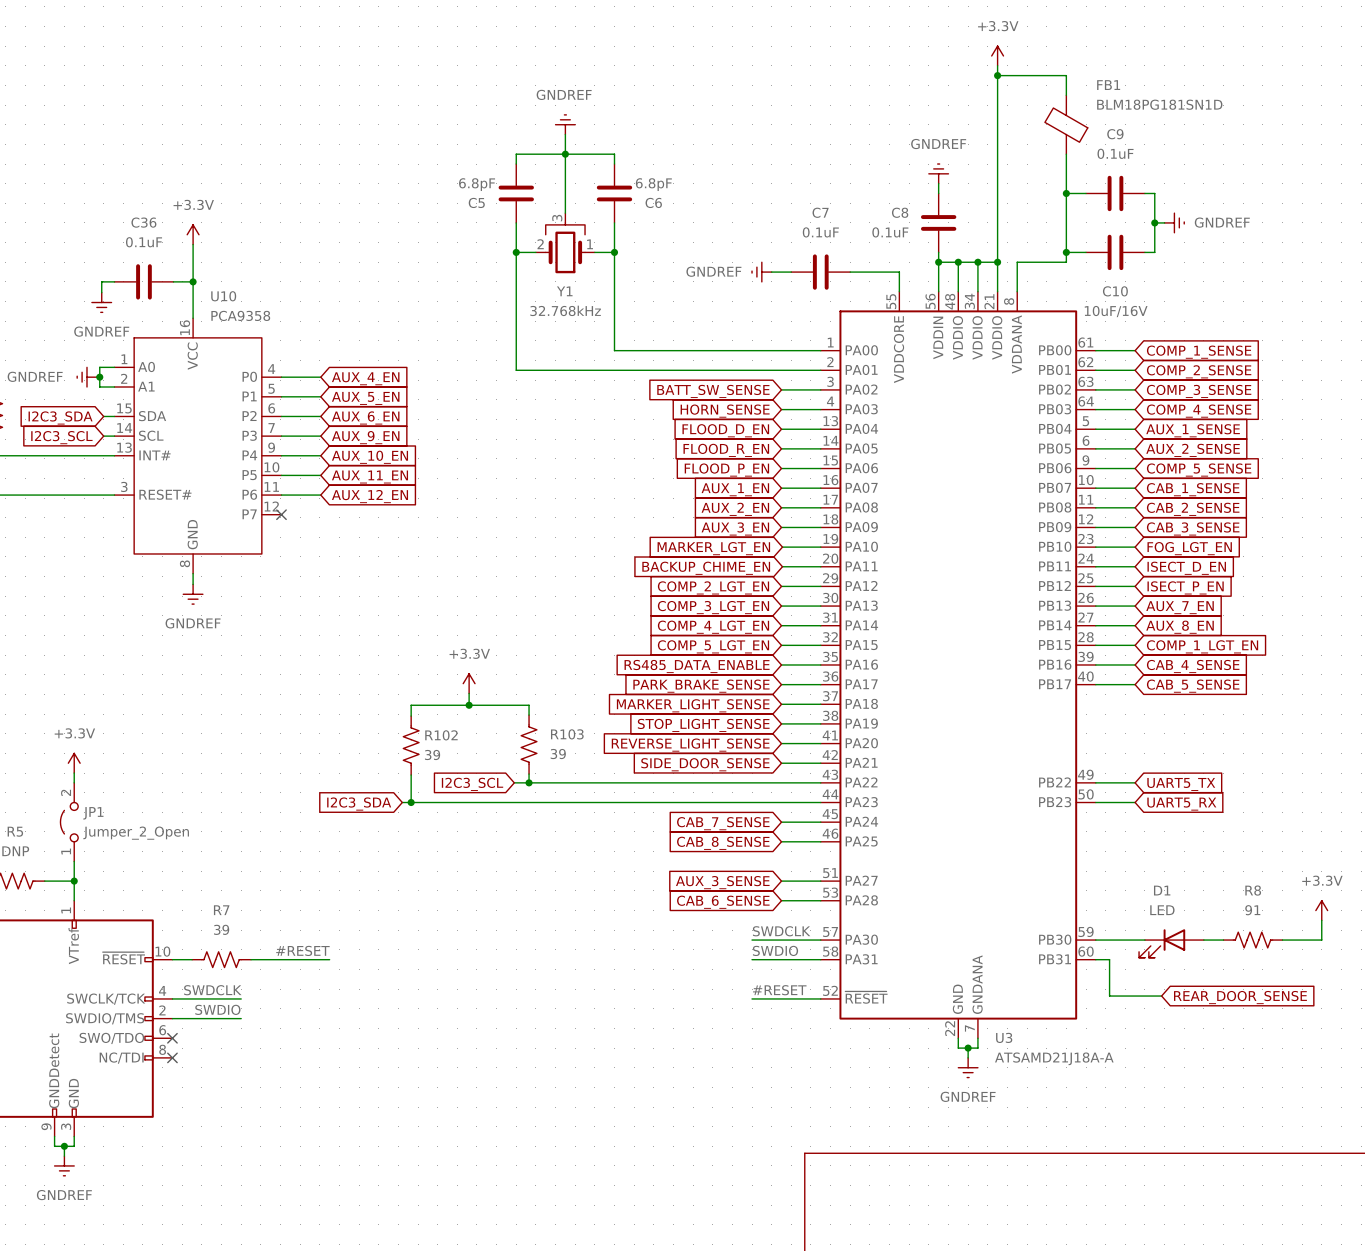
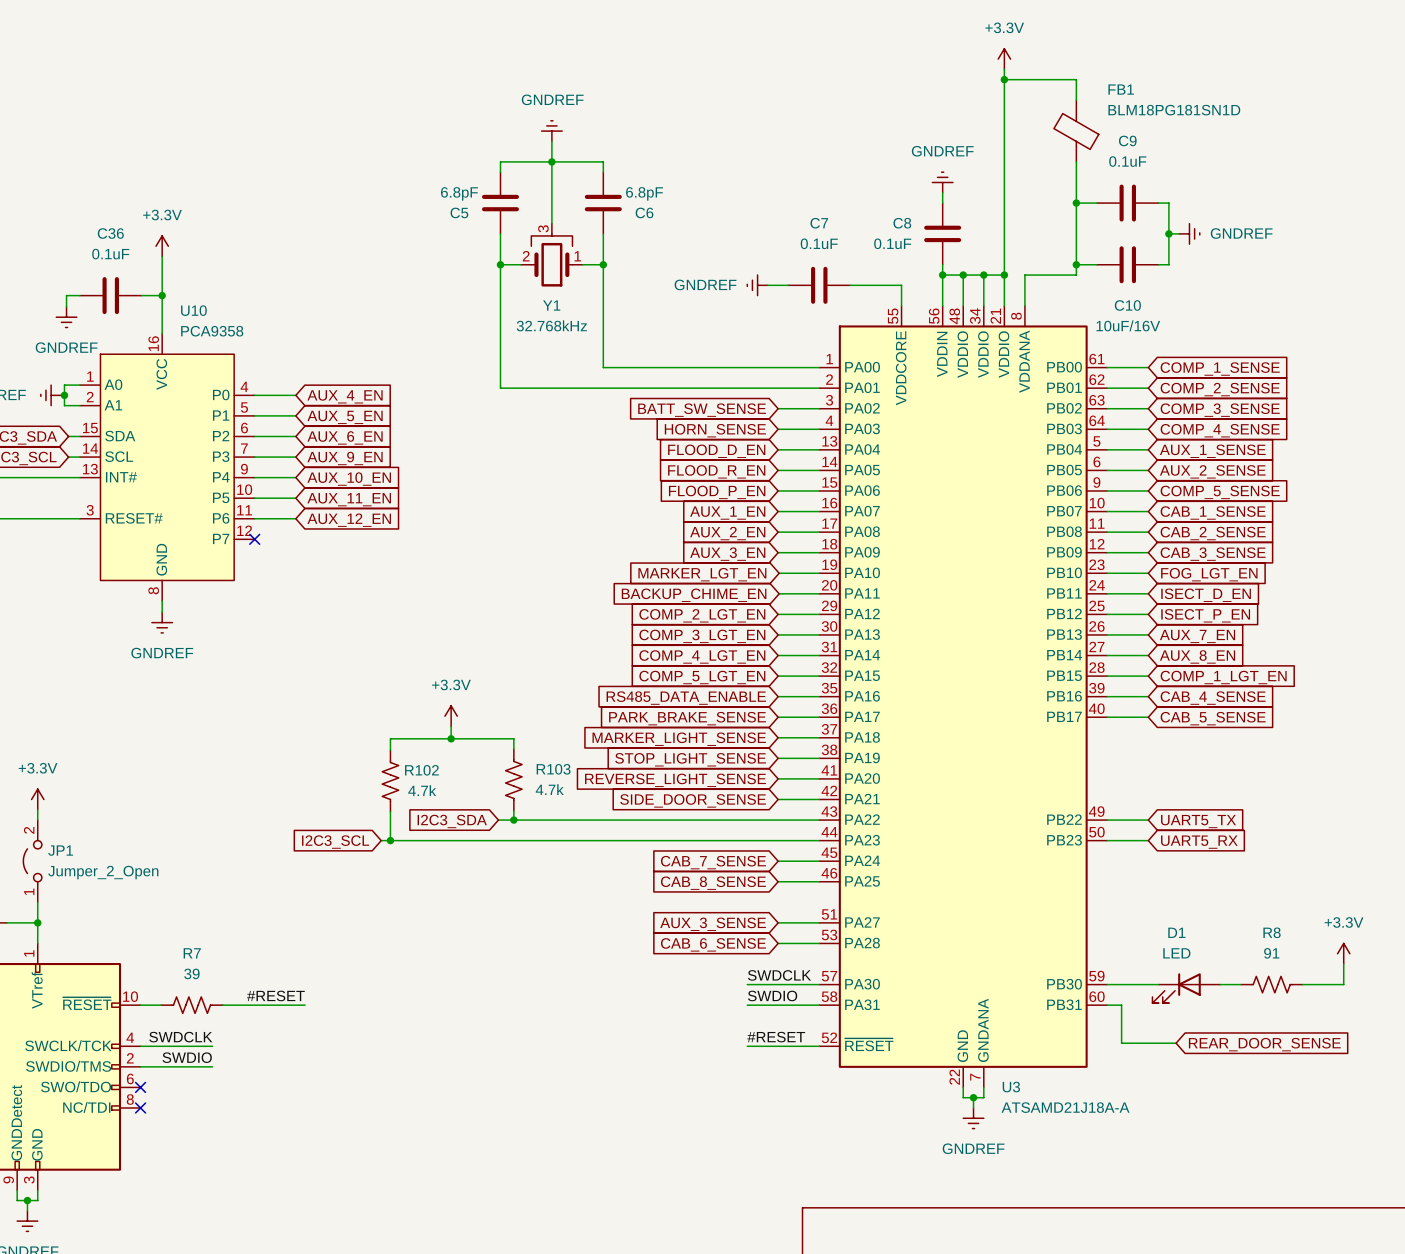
R103 value: 39 (558, 754) -> 4.7k (549, 789)
R102 value: 39 (432, 755) -> 4.7k (422, 790)
global label: I2C3_SCL (472, 784) -> I2C3_SDA (452, 821)
global label: I2C3_SDA (359, 804) -> I2C3_SCL (335, 842)

